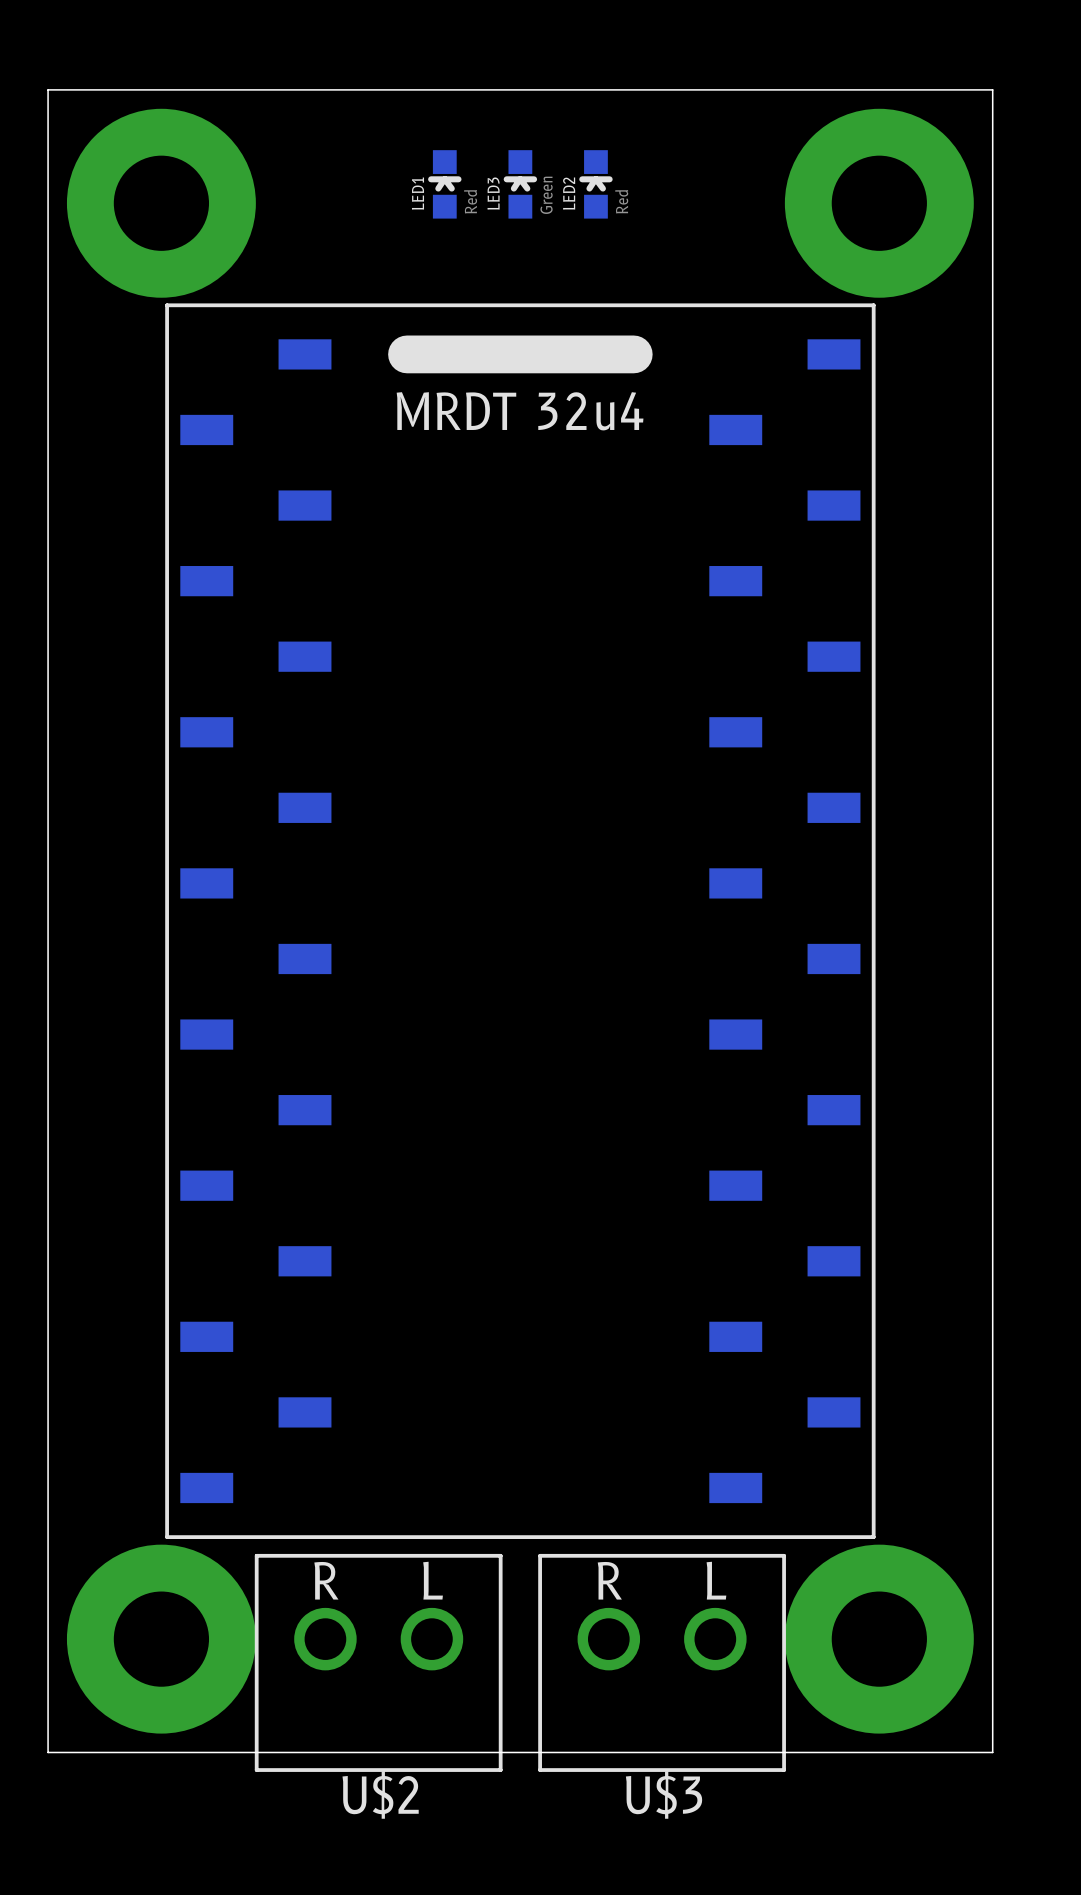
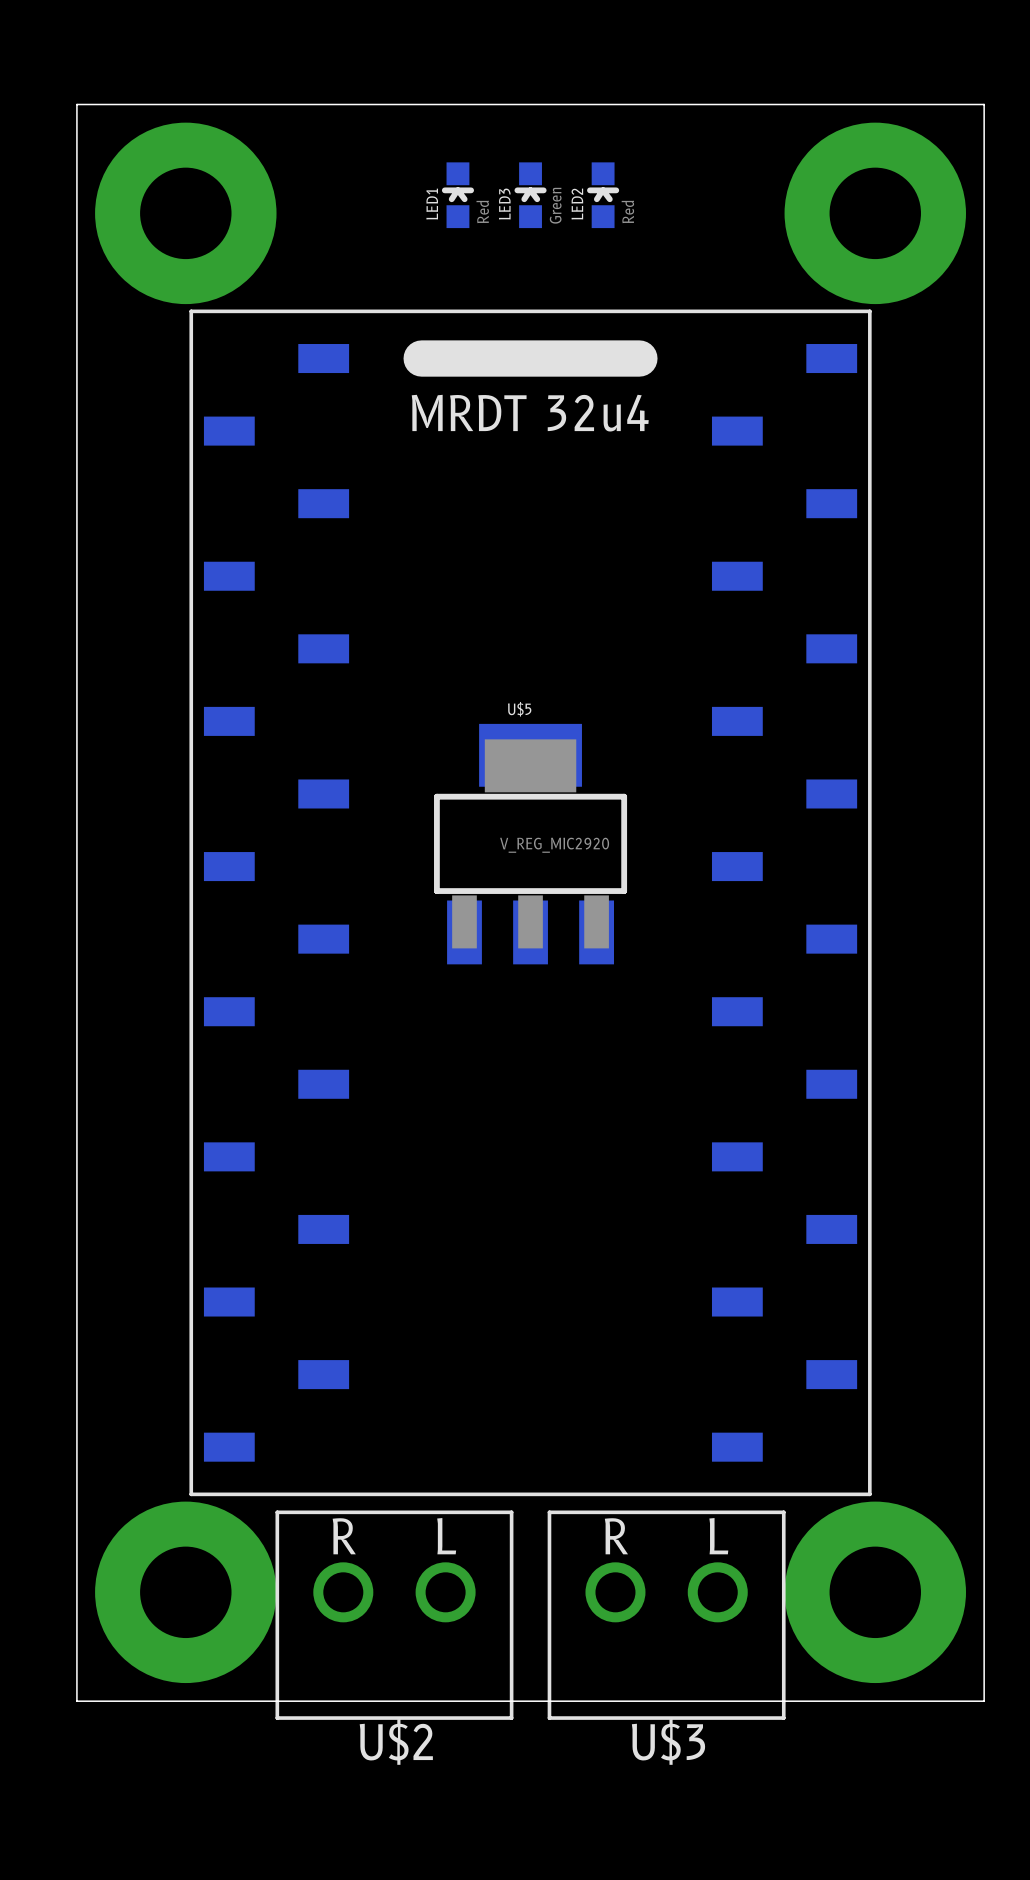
U$5: none -> V_REG_MIC2920 (530, 844)

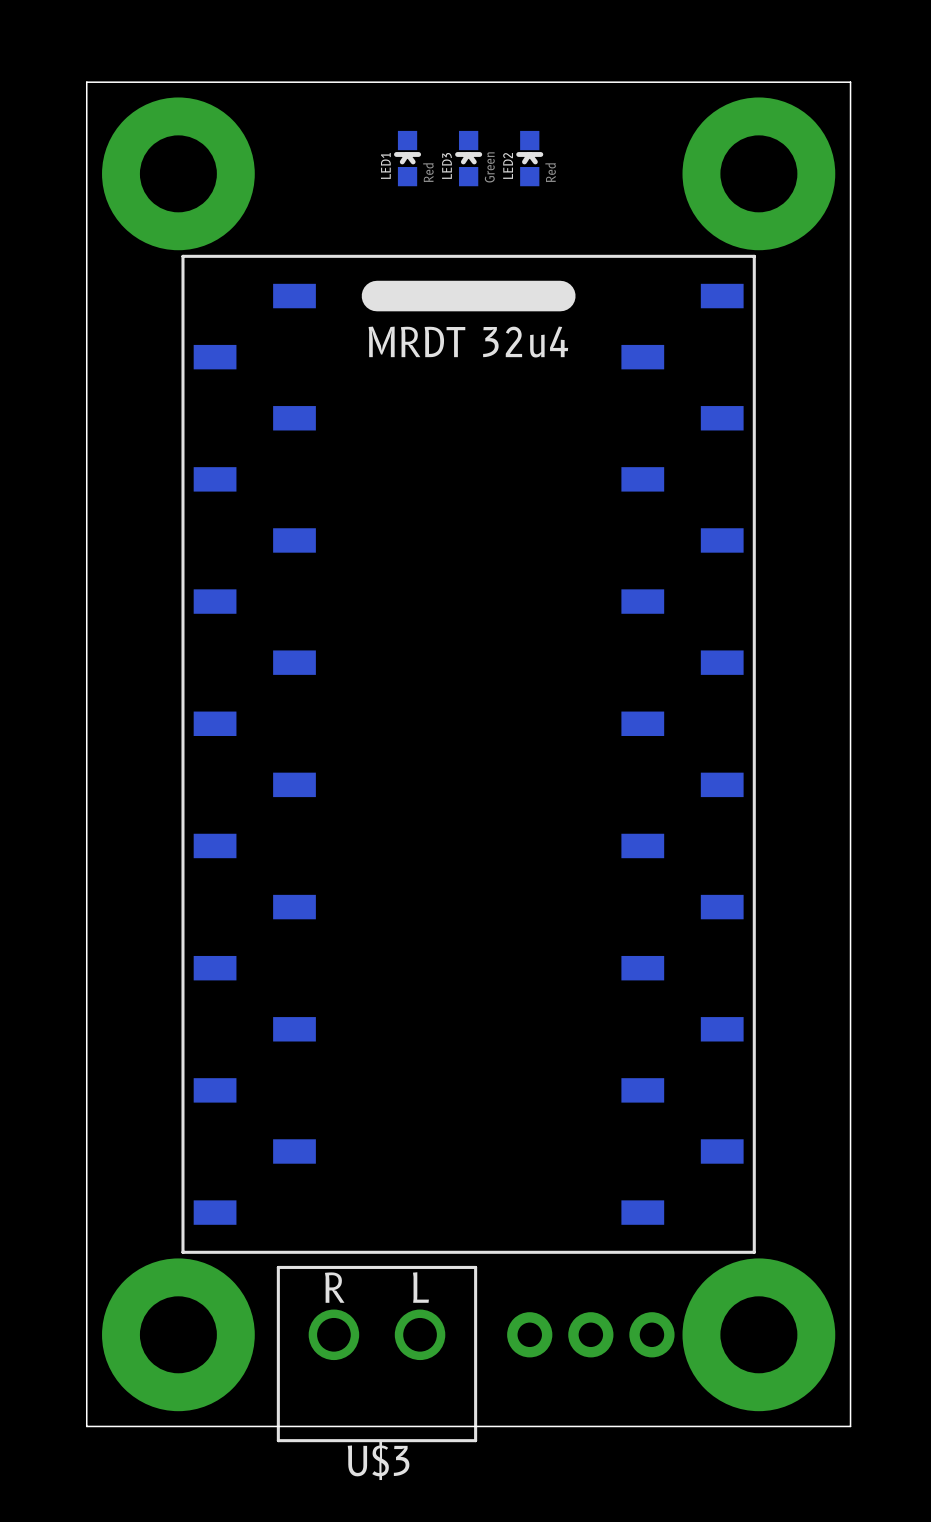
U$5: V_REG_MIC2920 (530, 844) -> none
part: none -> (590, 1334)
U$2: (394, 1615) -> none
U$3 position: (666, 1615) -> (376, 1354)

